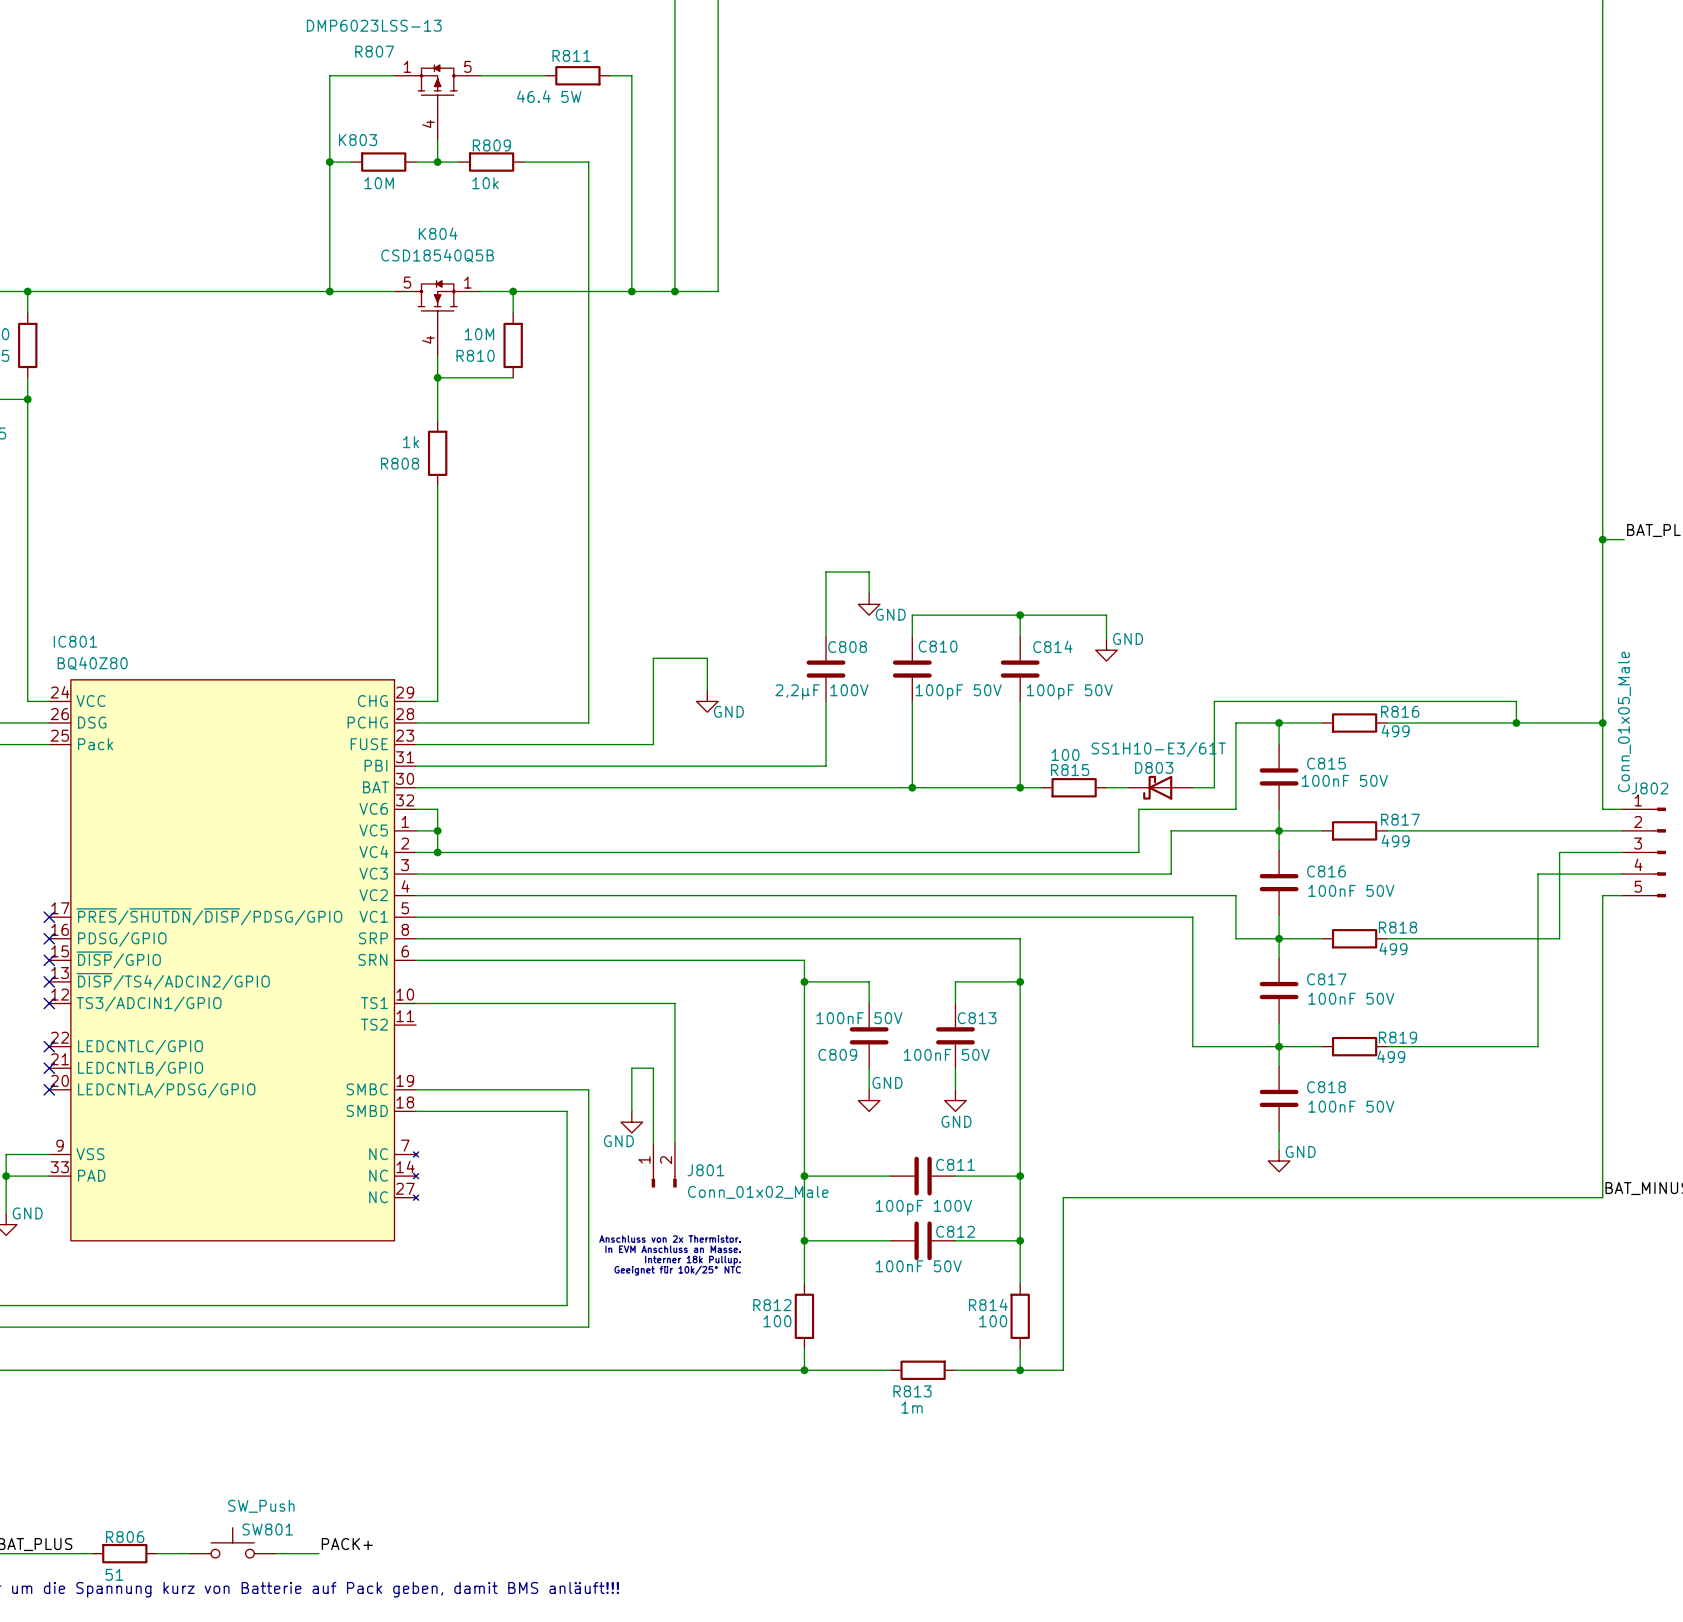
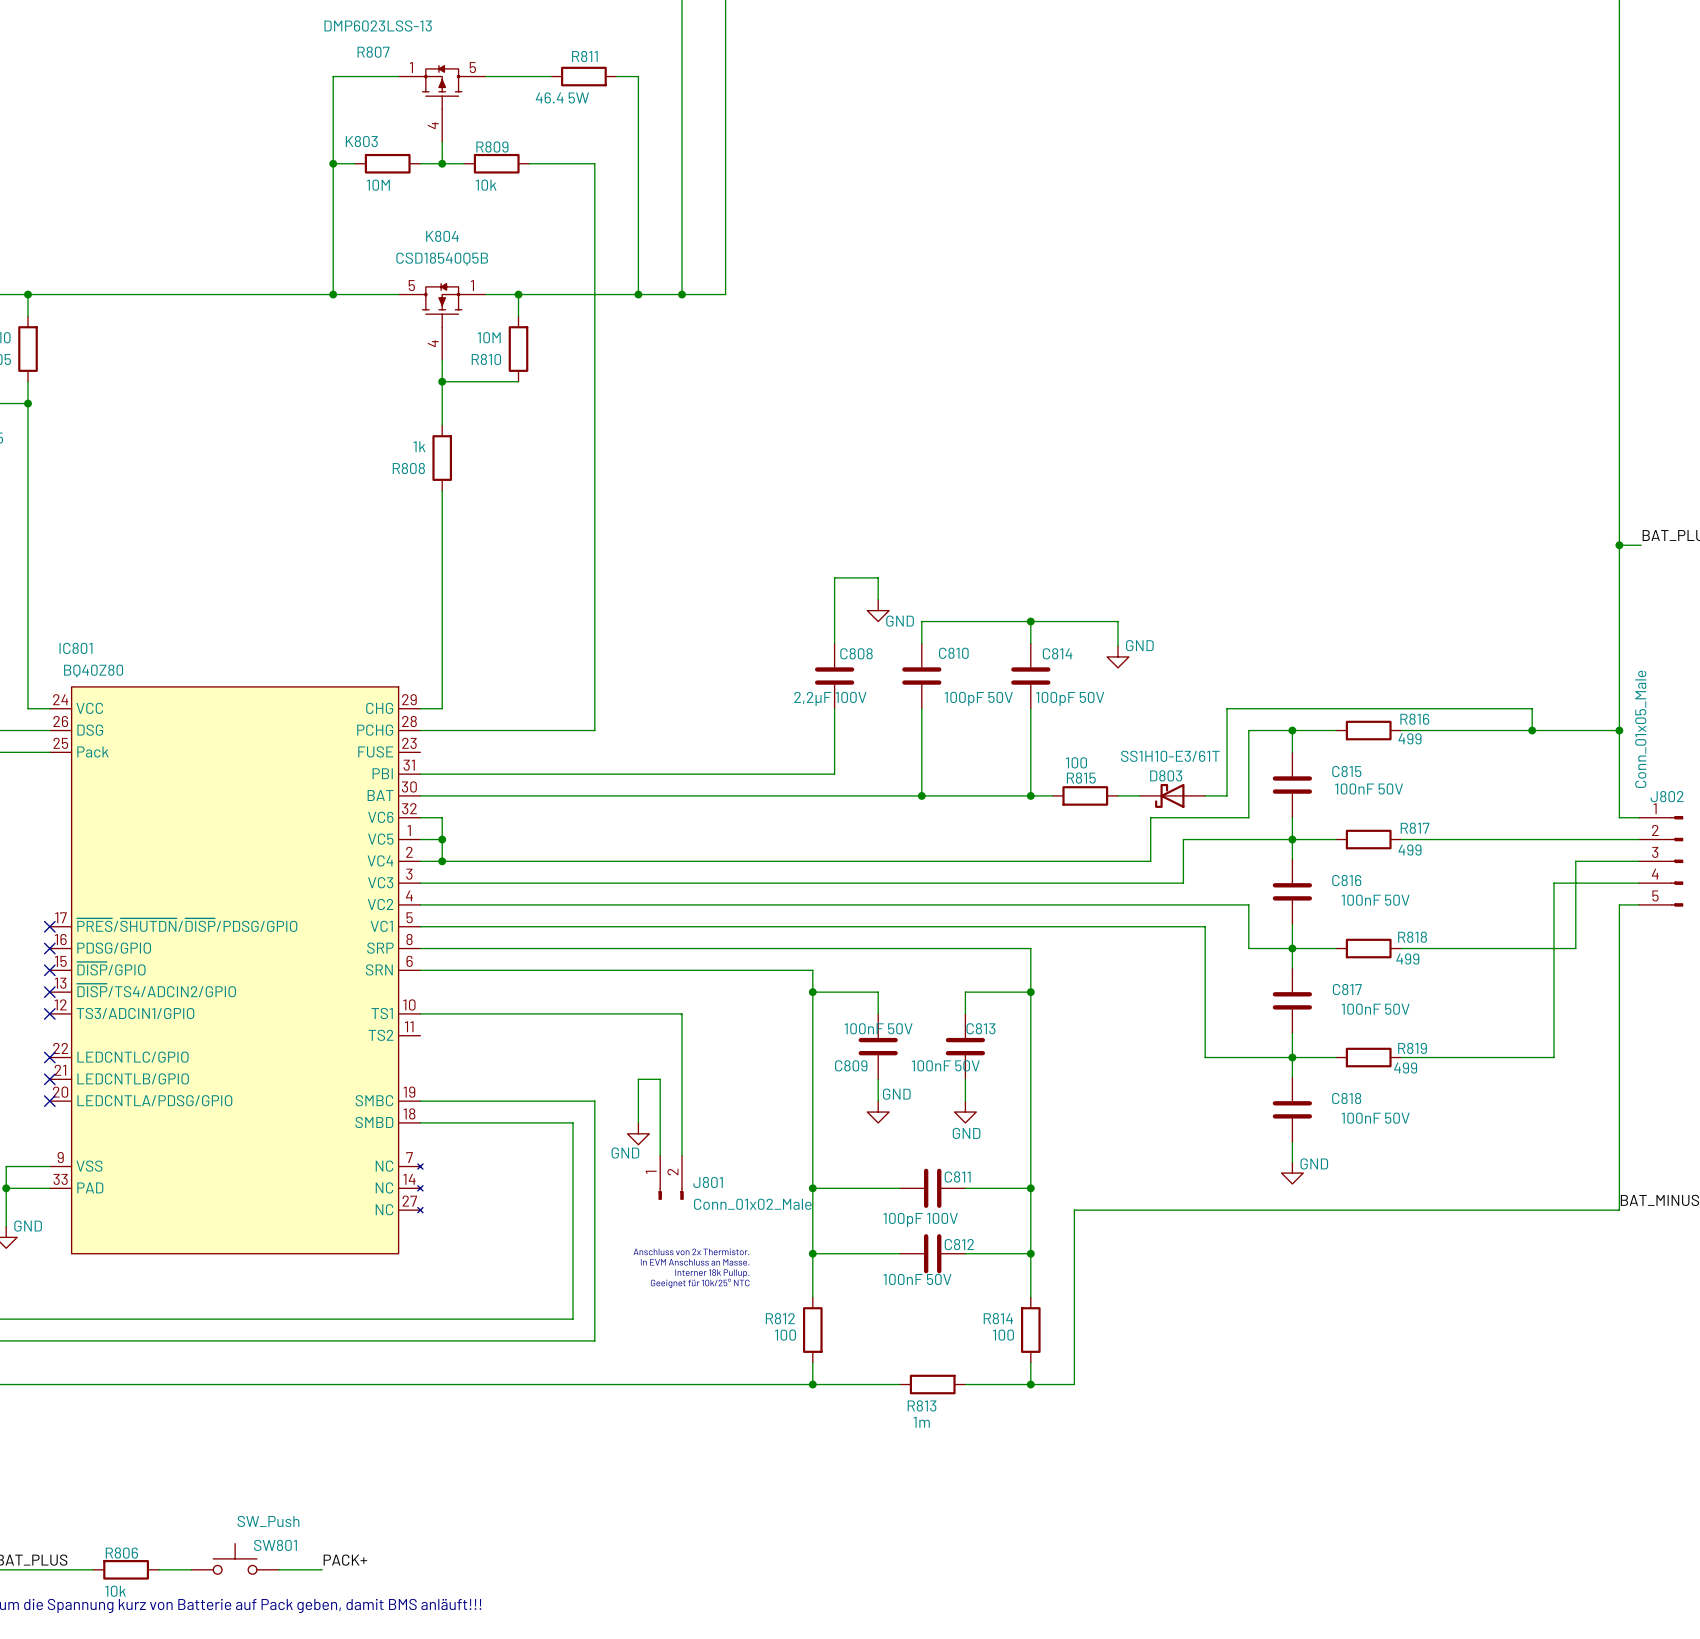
wire: (707, 690) (707, 658) (653, 658) (653, 744) (416, 744) -> none
power symbol: GND (707, 701) -> none
R806 value: 51 (114, 1574) -> 10k (115, 1591)

